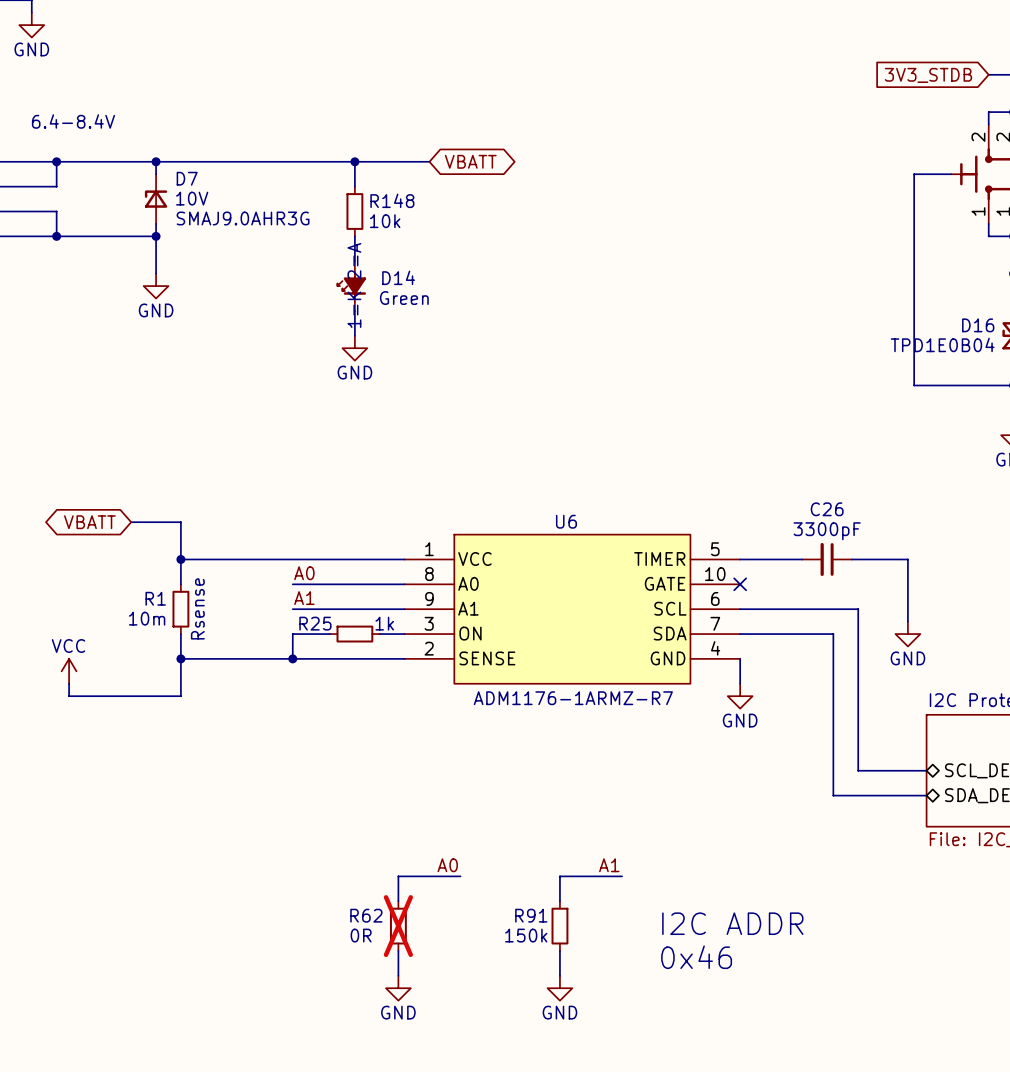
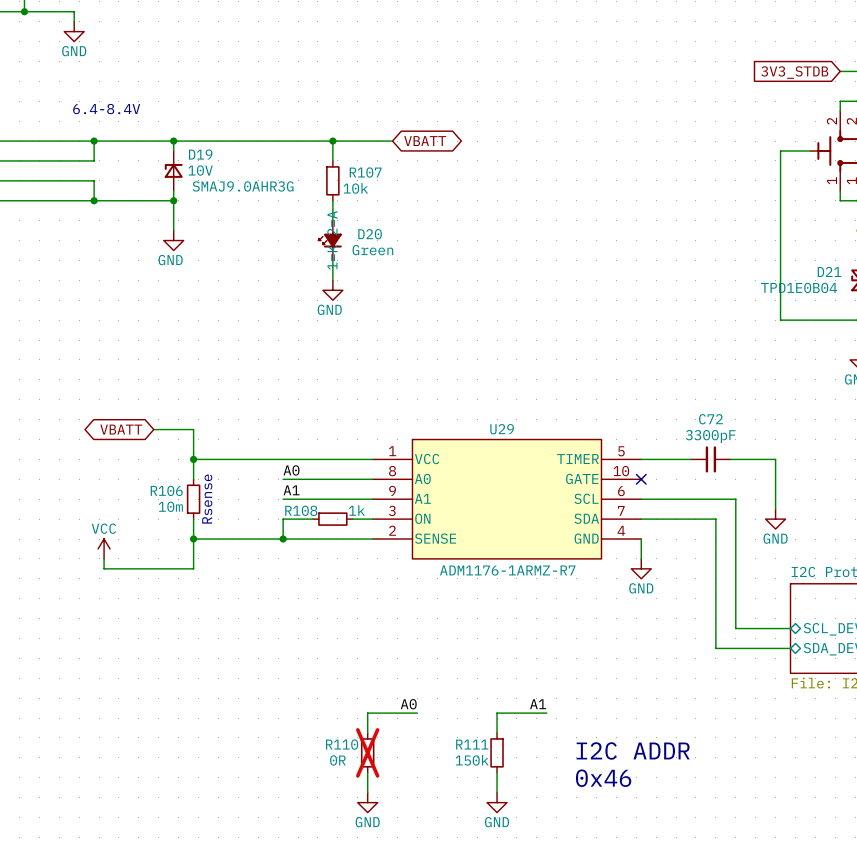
D7 name: D7 (187, 178) -> D19 (200, 154)
R148 name: R148 (392, 200) -> R107 (365, 172)
D14 name: D14 (398, 277) -> D20 (370, 234)
D16 name: D16 (978, 325) -> D21 (829, 271)
U6 name: U6 (566, 521) -> U29 (502, 429)
C26: 3300pF (827, 559) -> none
C72: none -> 3300pF (710, 459)
R1 name: R1 (155, 598) -> R106 (166, 490)
R25 name: R25 (315, 623) -> R108 (301, 510)
R62 name: R62 (366, 915) -> R110 (342, 744)
R91 name: R91 (531, 915) -> R111 (472, 744)

